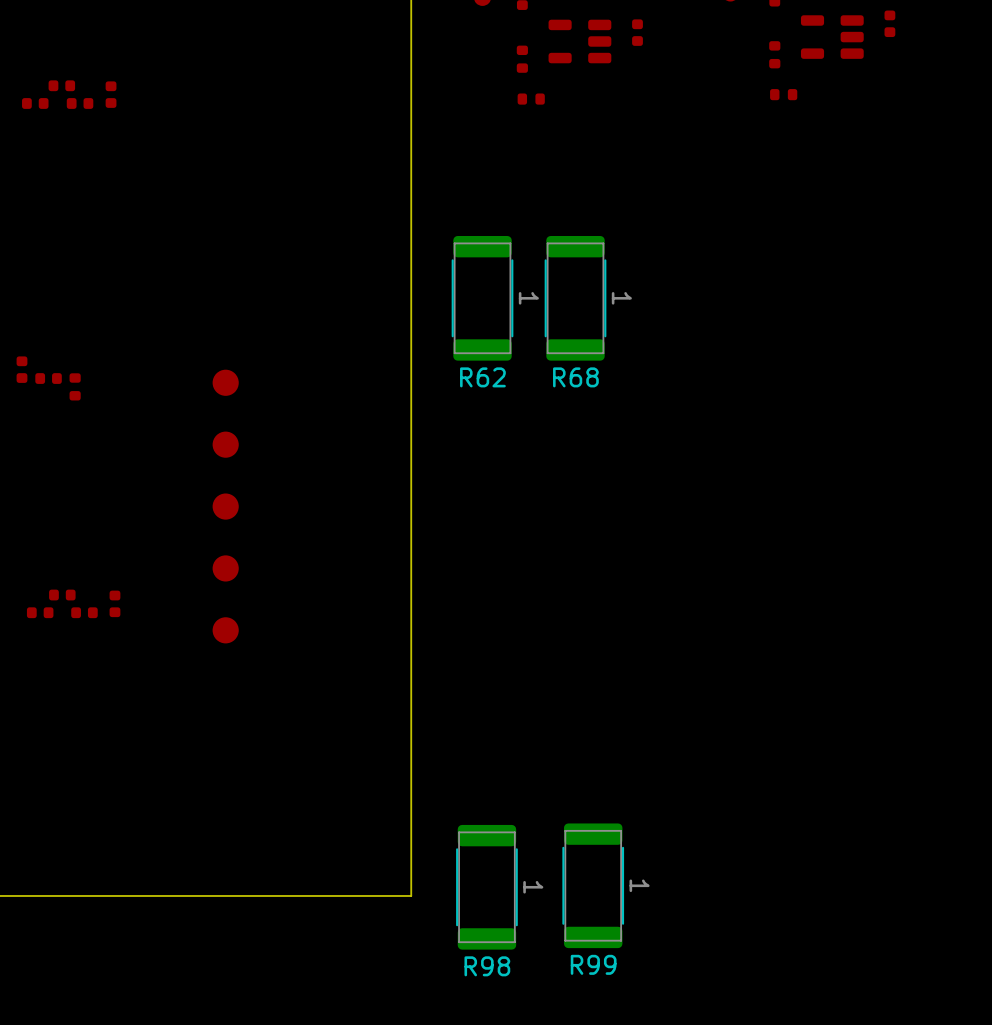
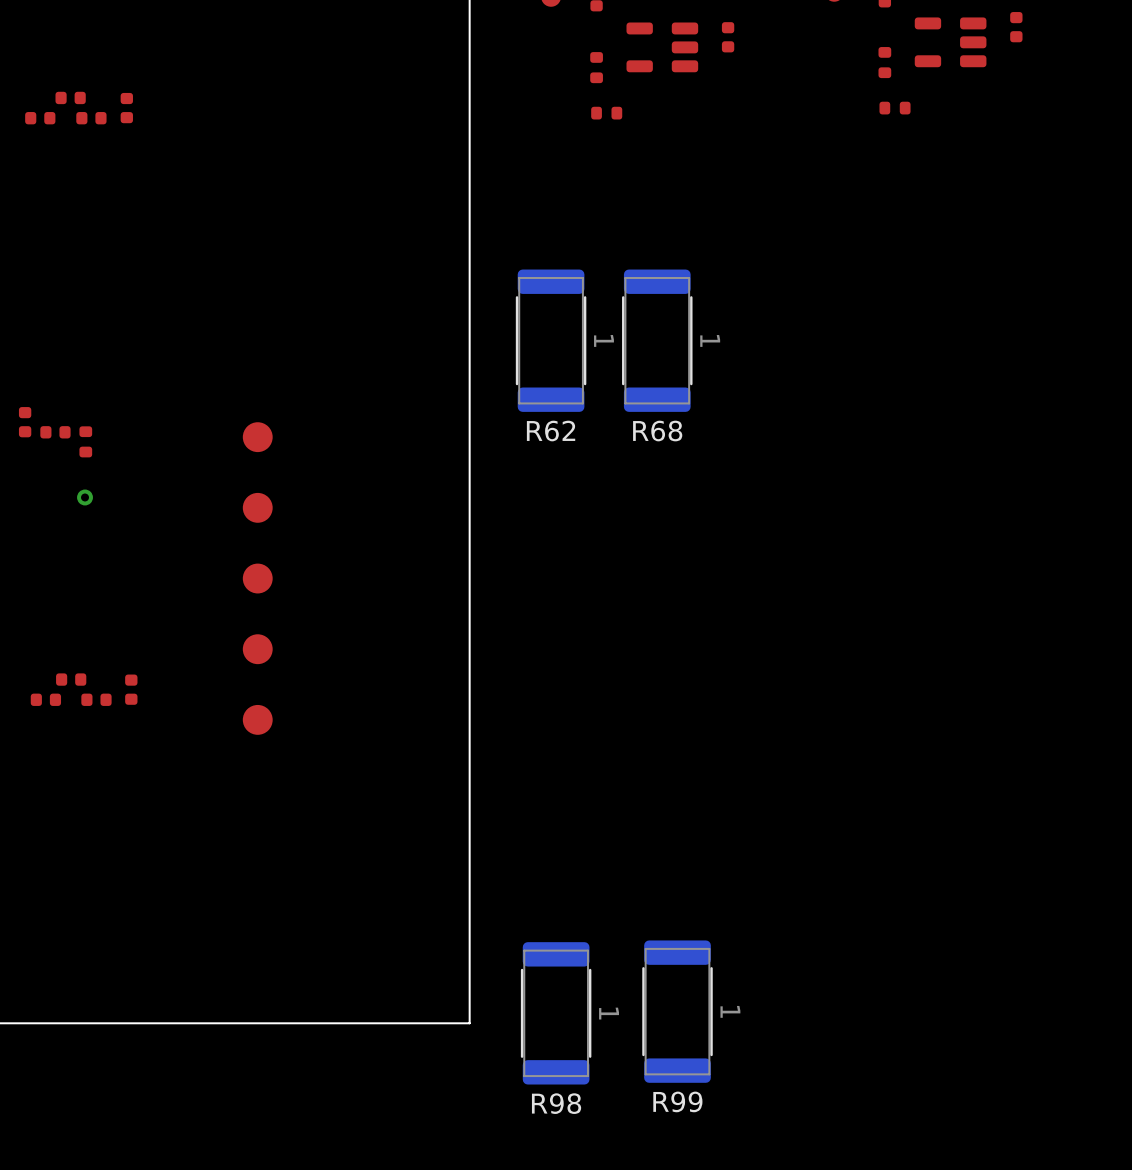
via: none -> (85, 497)

